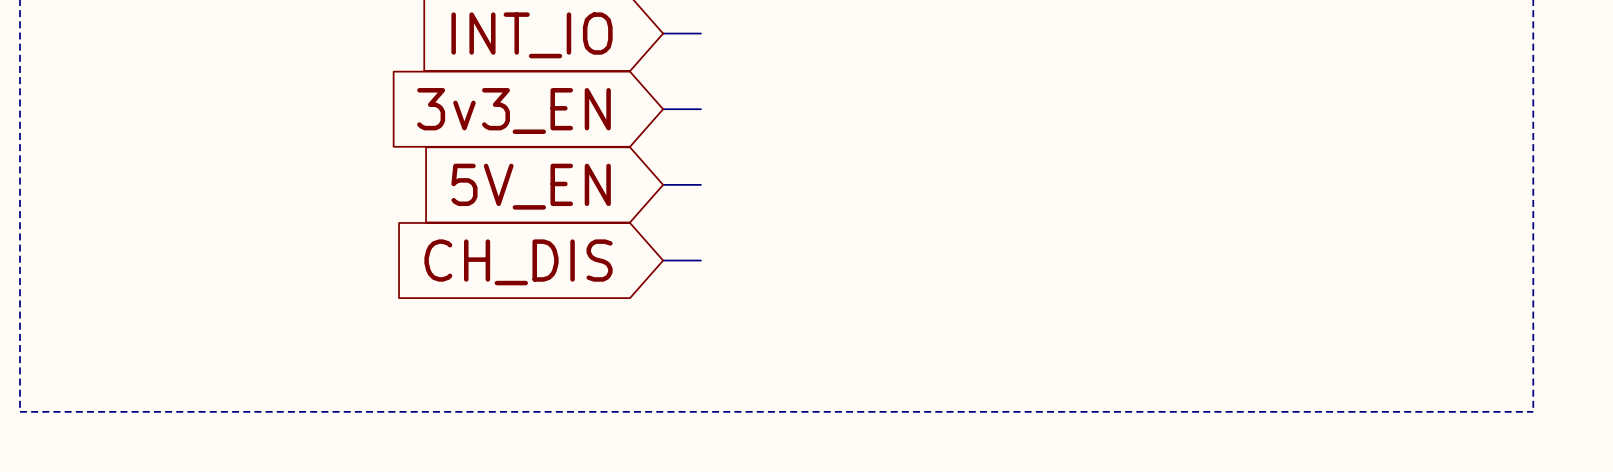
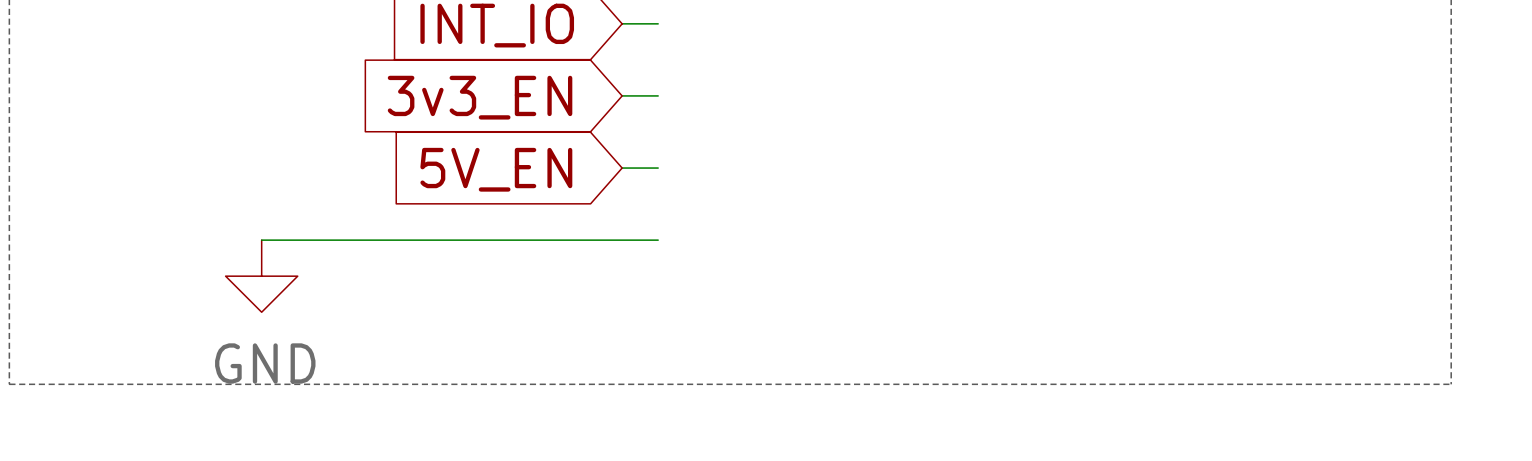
wire: none -> (261, 240) (622, 240)
global label: CH_DIS (518, 262) -> none
power symbol: none -> GND (261, 276)

